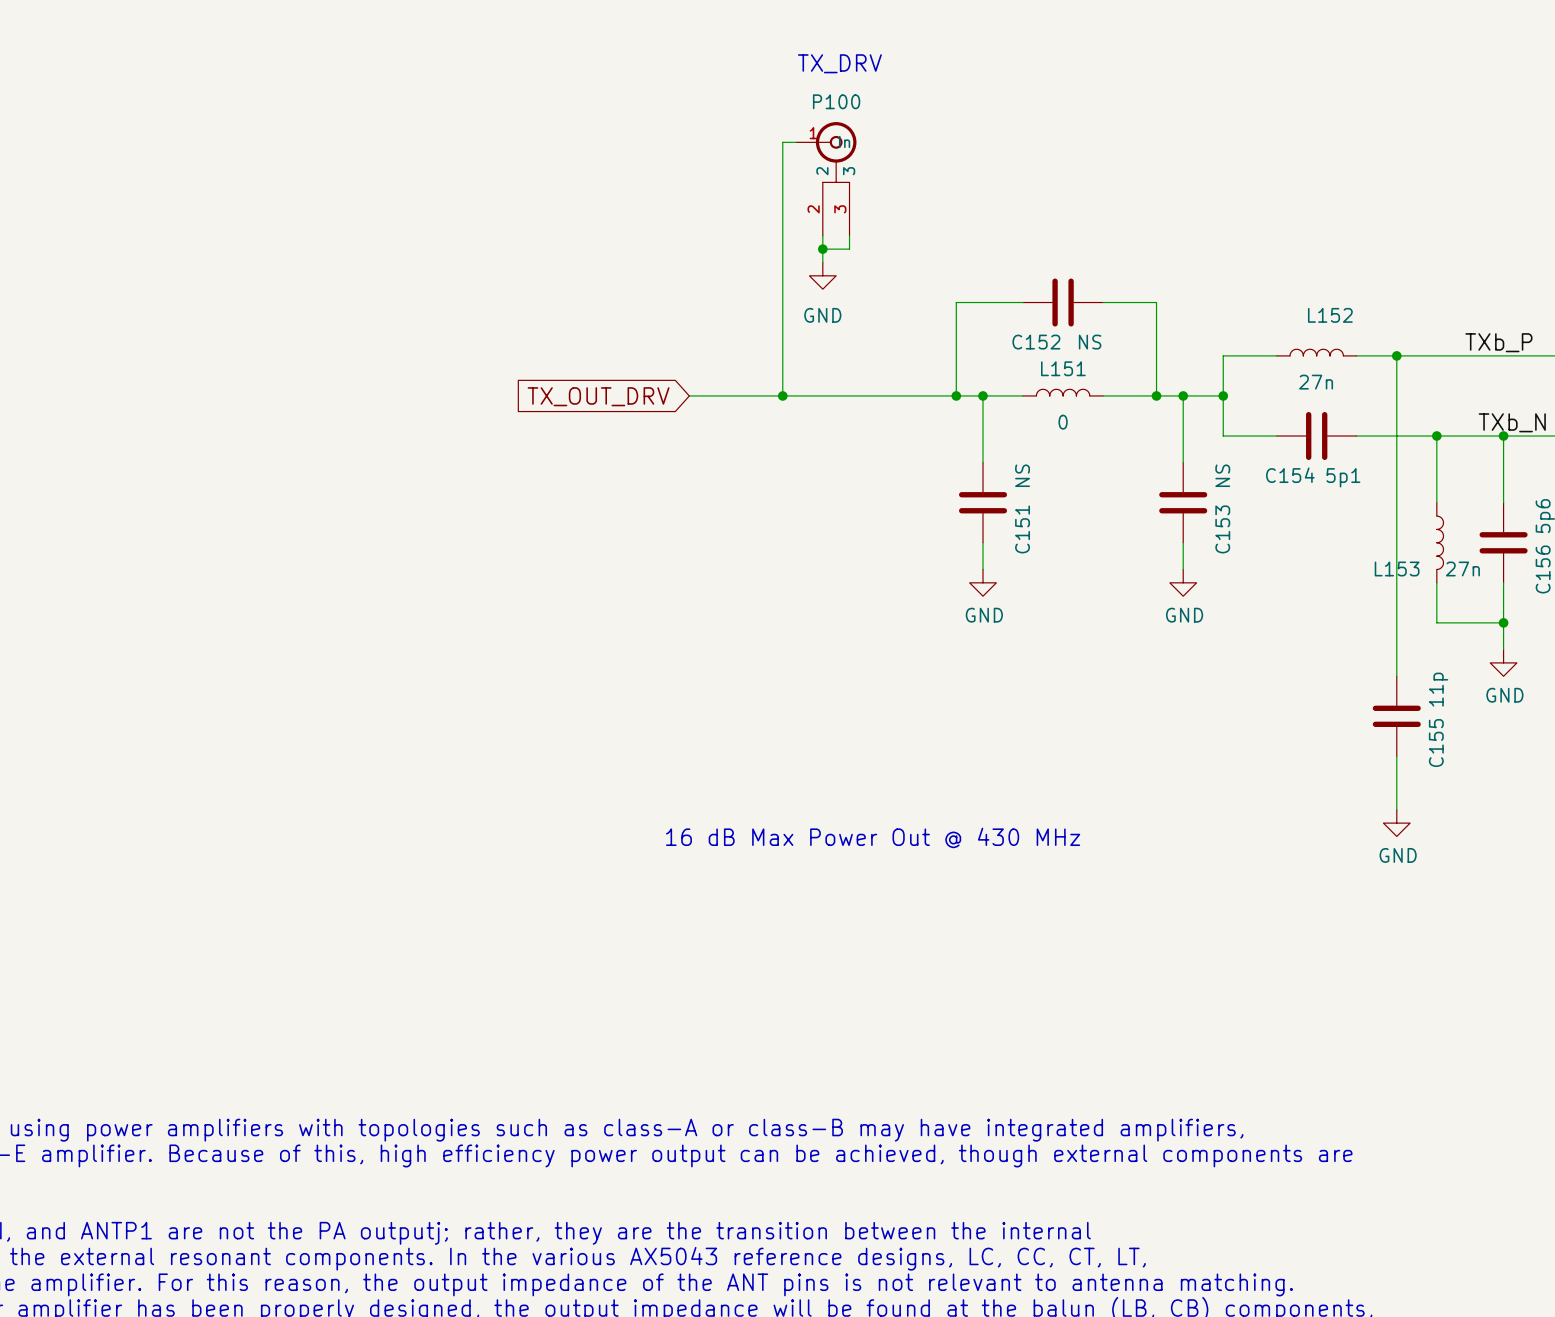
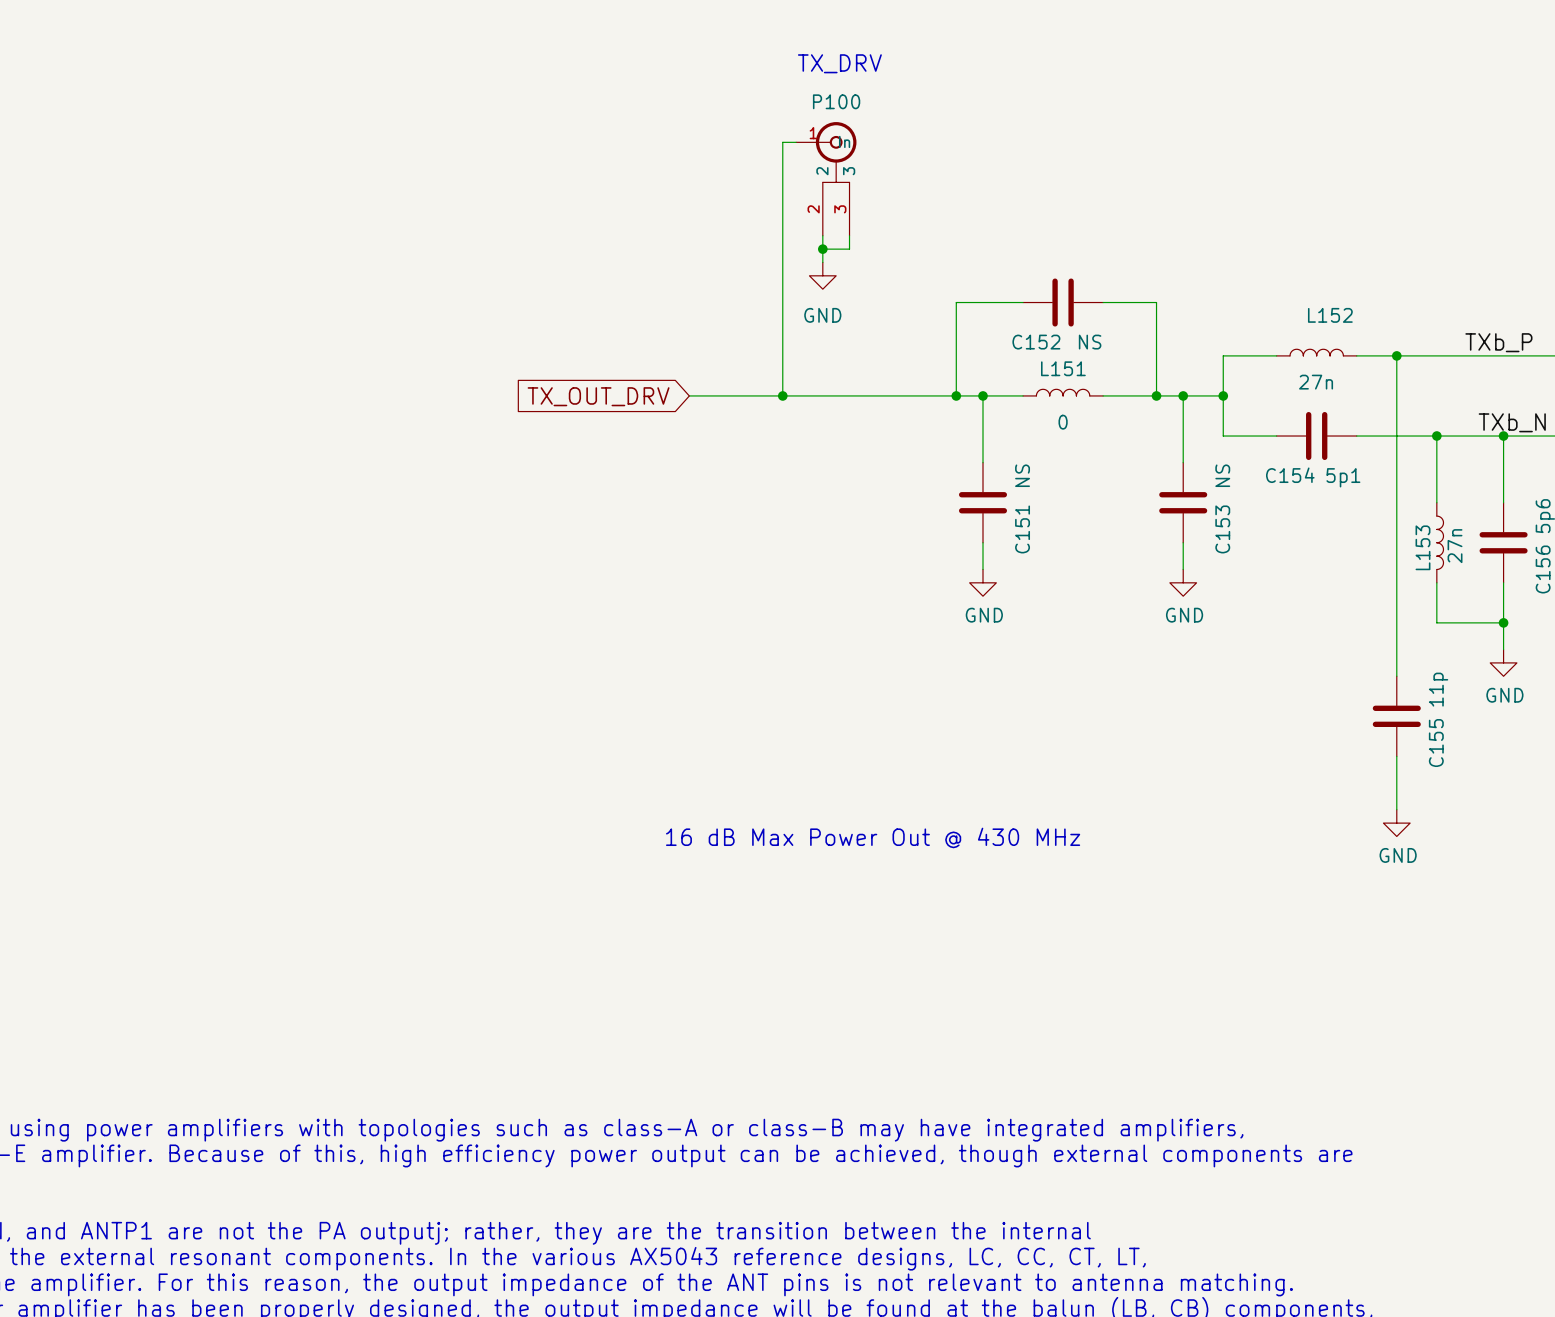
L153 name rotation: 0° (1397, 568) -> 90° counterclockwise (1422, 547)
L153 value rotation: 0° (1462, 568) -> 90° counterclockwise (1455, 546)

